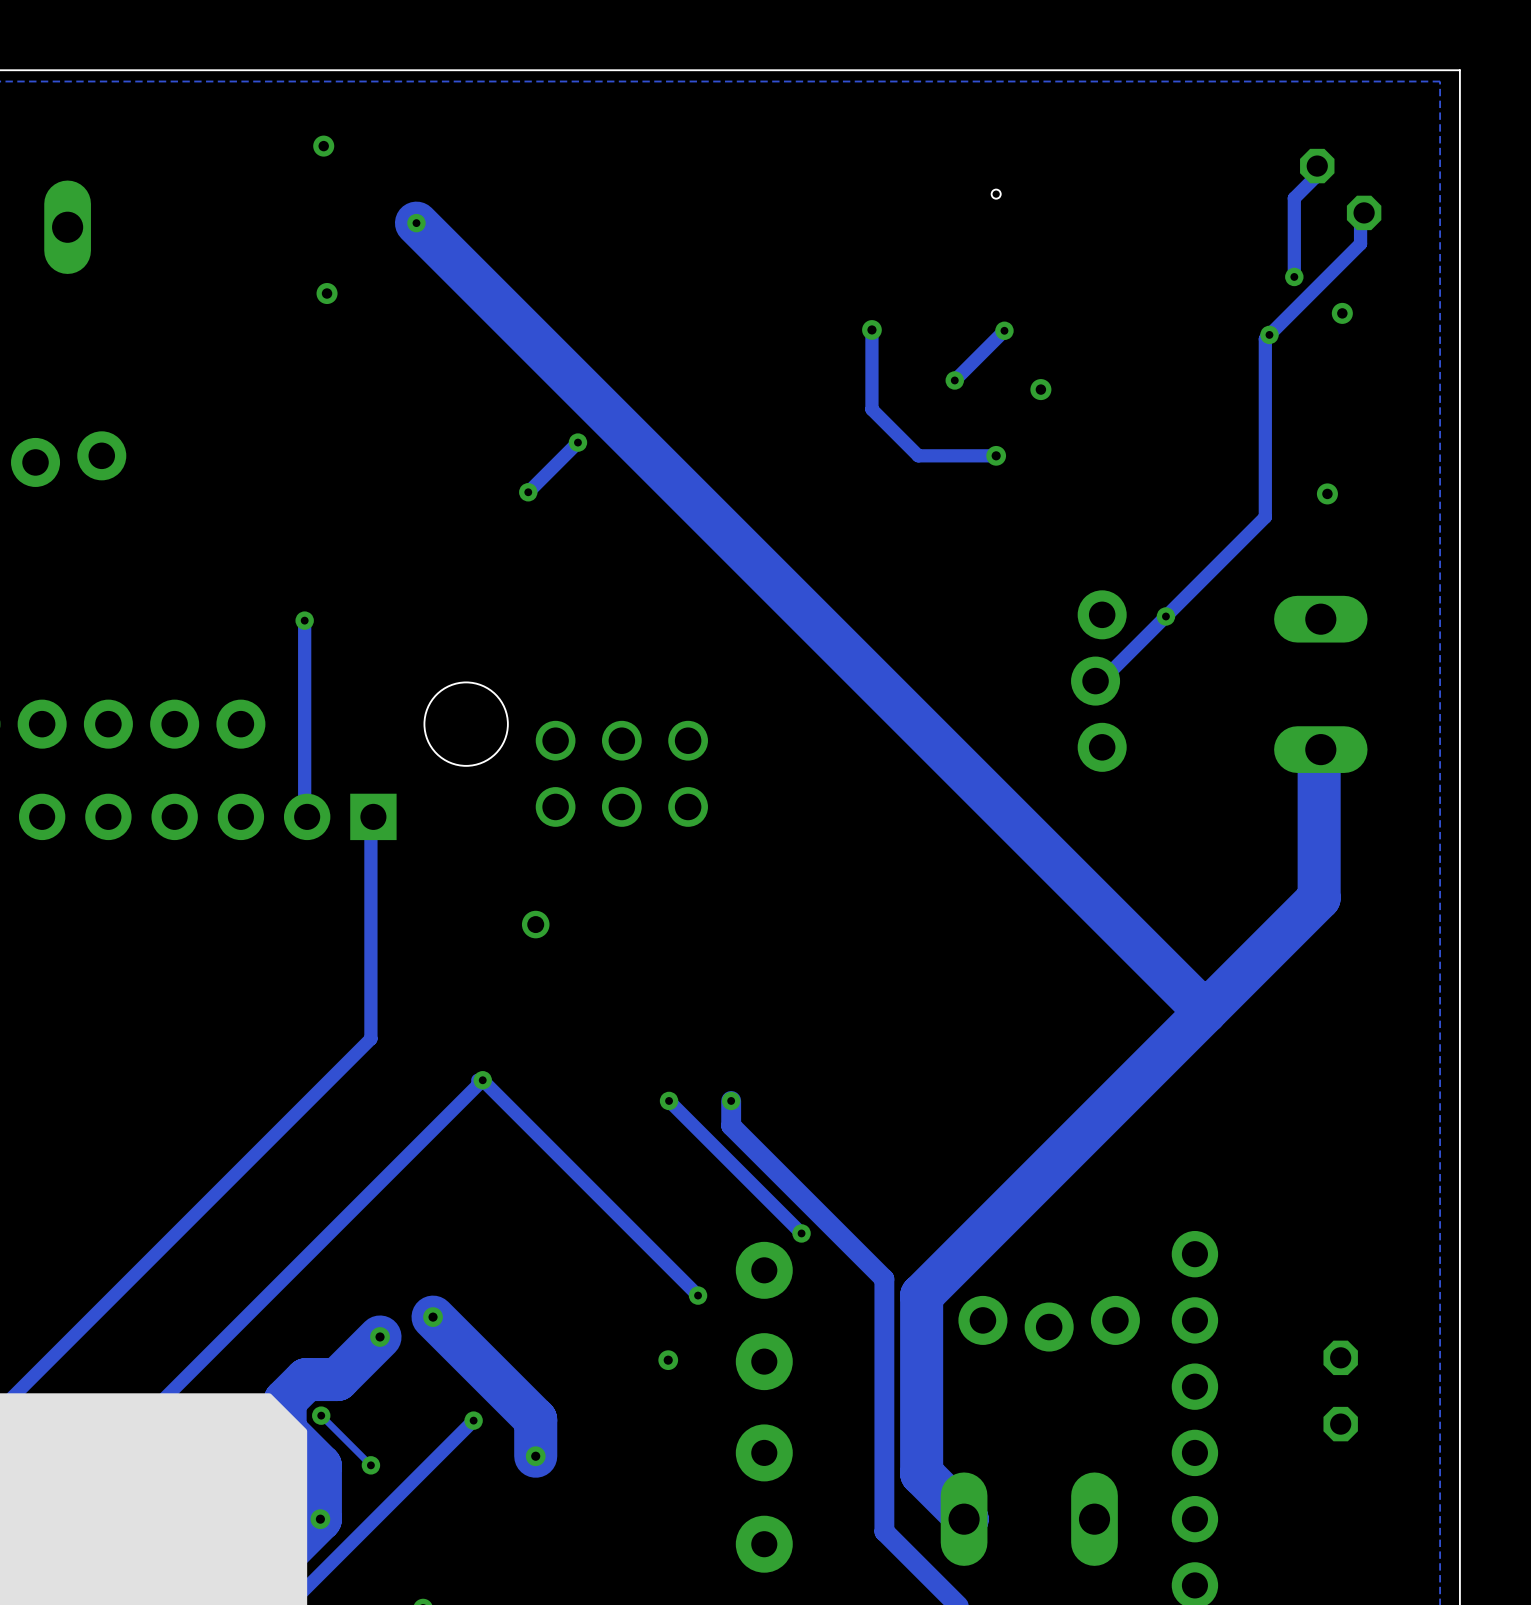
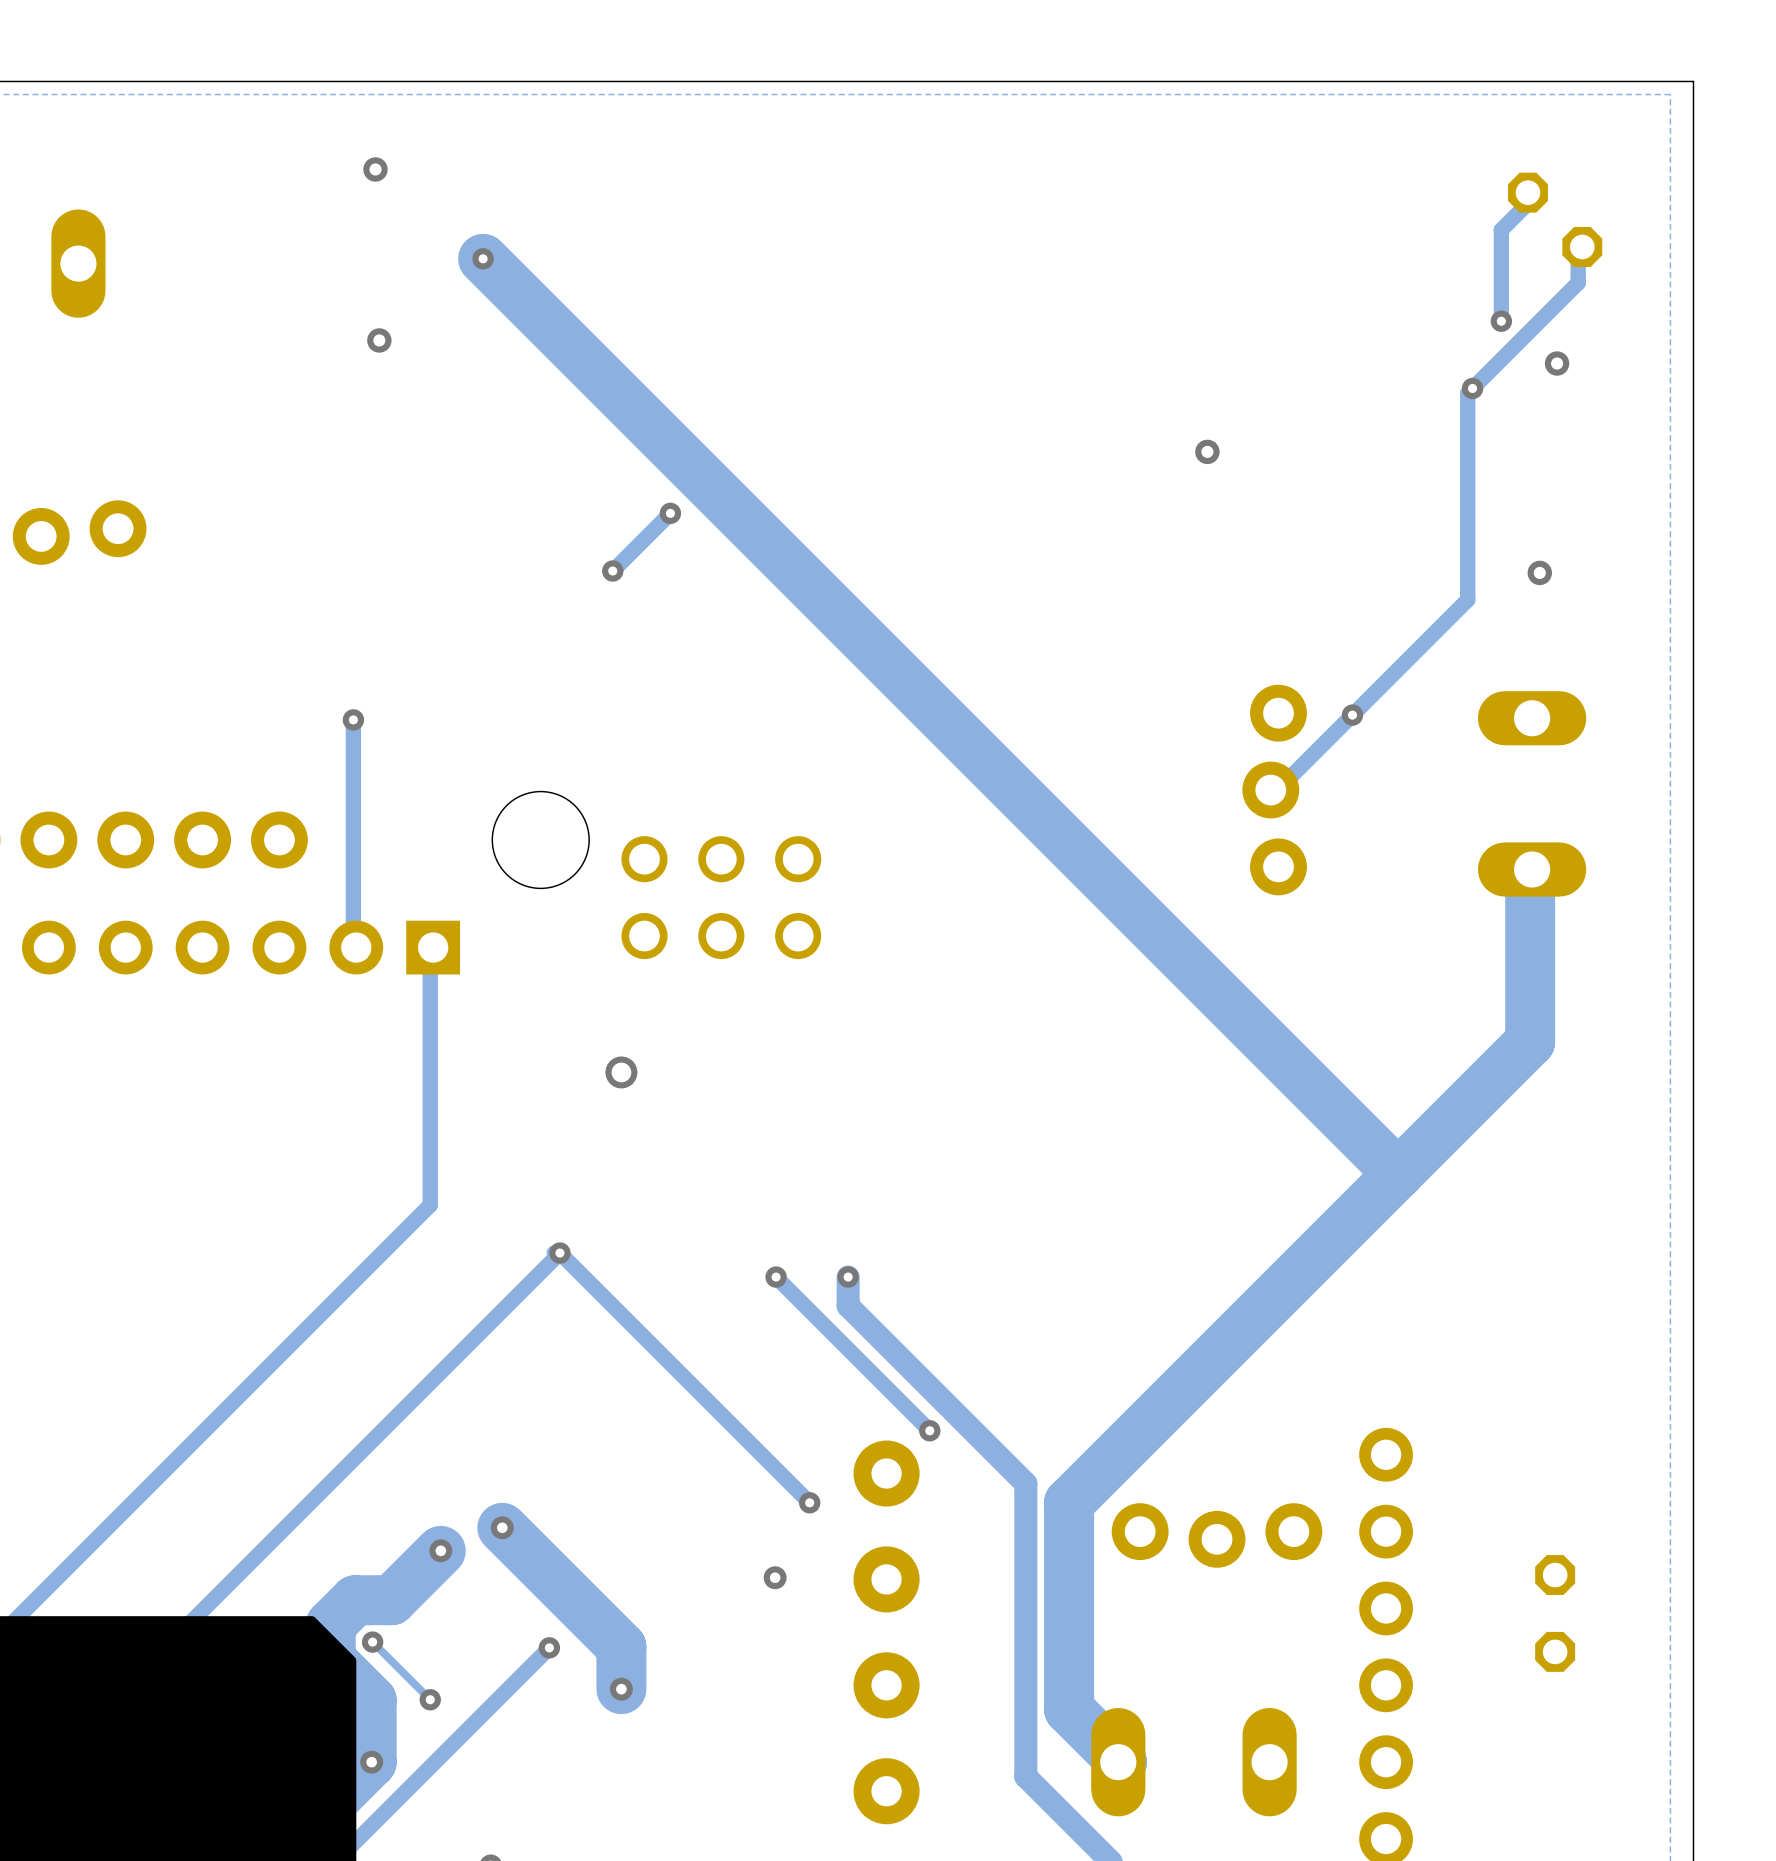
hole: (996, 194) -> none
track: (871, 329) (871, 409) (918, 455) (996, 455) -> none
via: (871, 329) -> none
track: (1004, 330) (954, 380) -> none
via: (1004, 330) -> none
via: (954, 380) -> none
via: (996, 455) -> none

